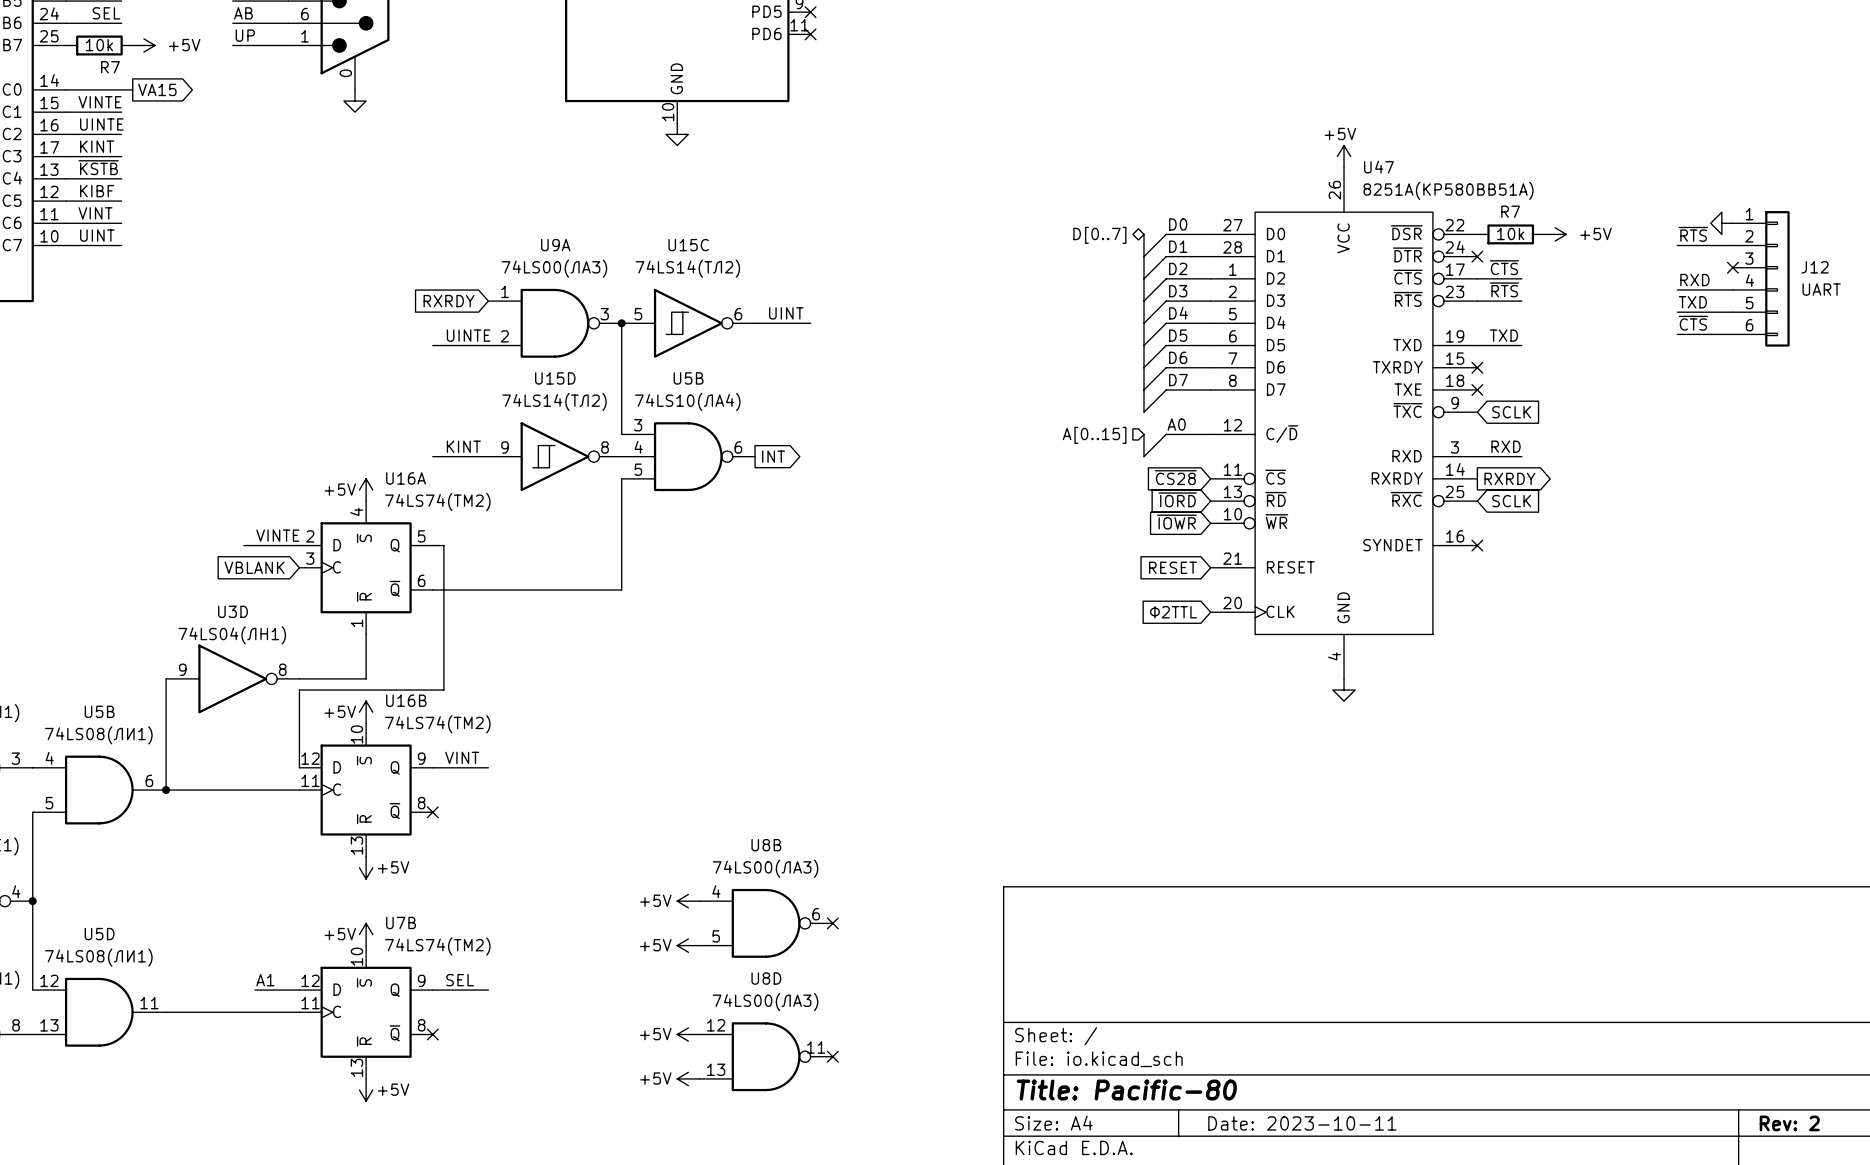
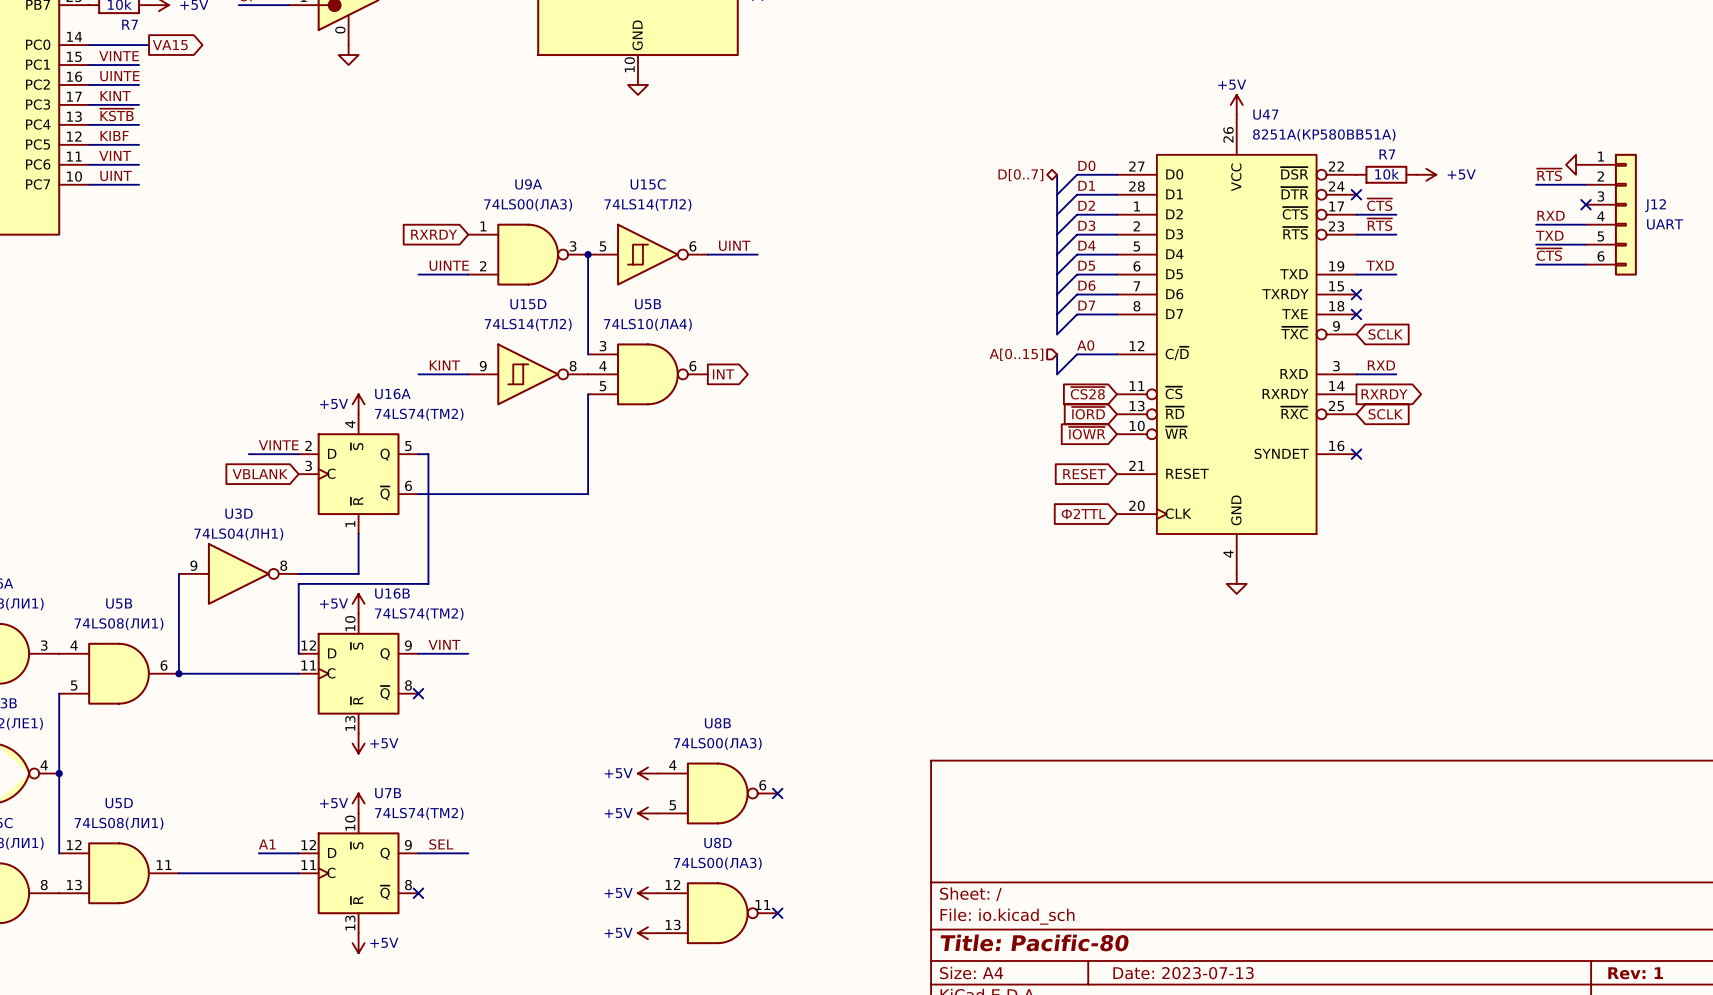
title block: Date: 2023-10-11 (1302, 1123) -> Date: 2023-07-13 (1183, 973)
title block: Rev: 2 (1789, 1123) -> Rev: 1 (1635, 973)

